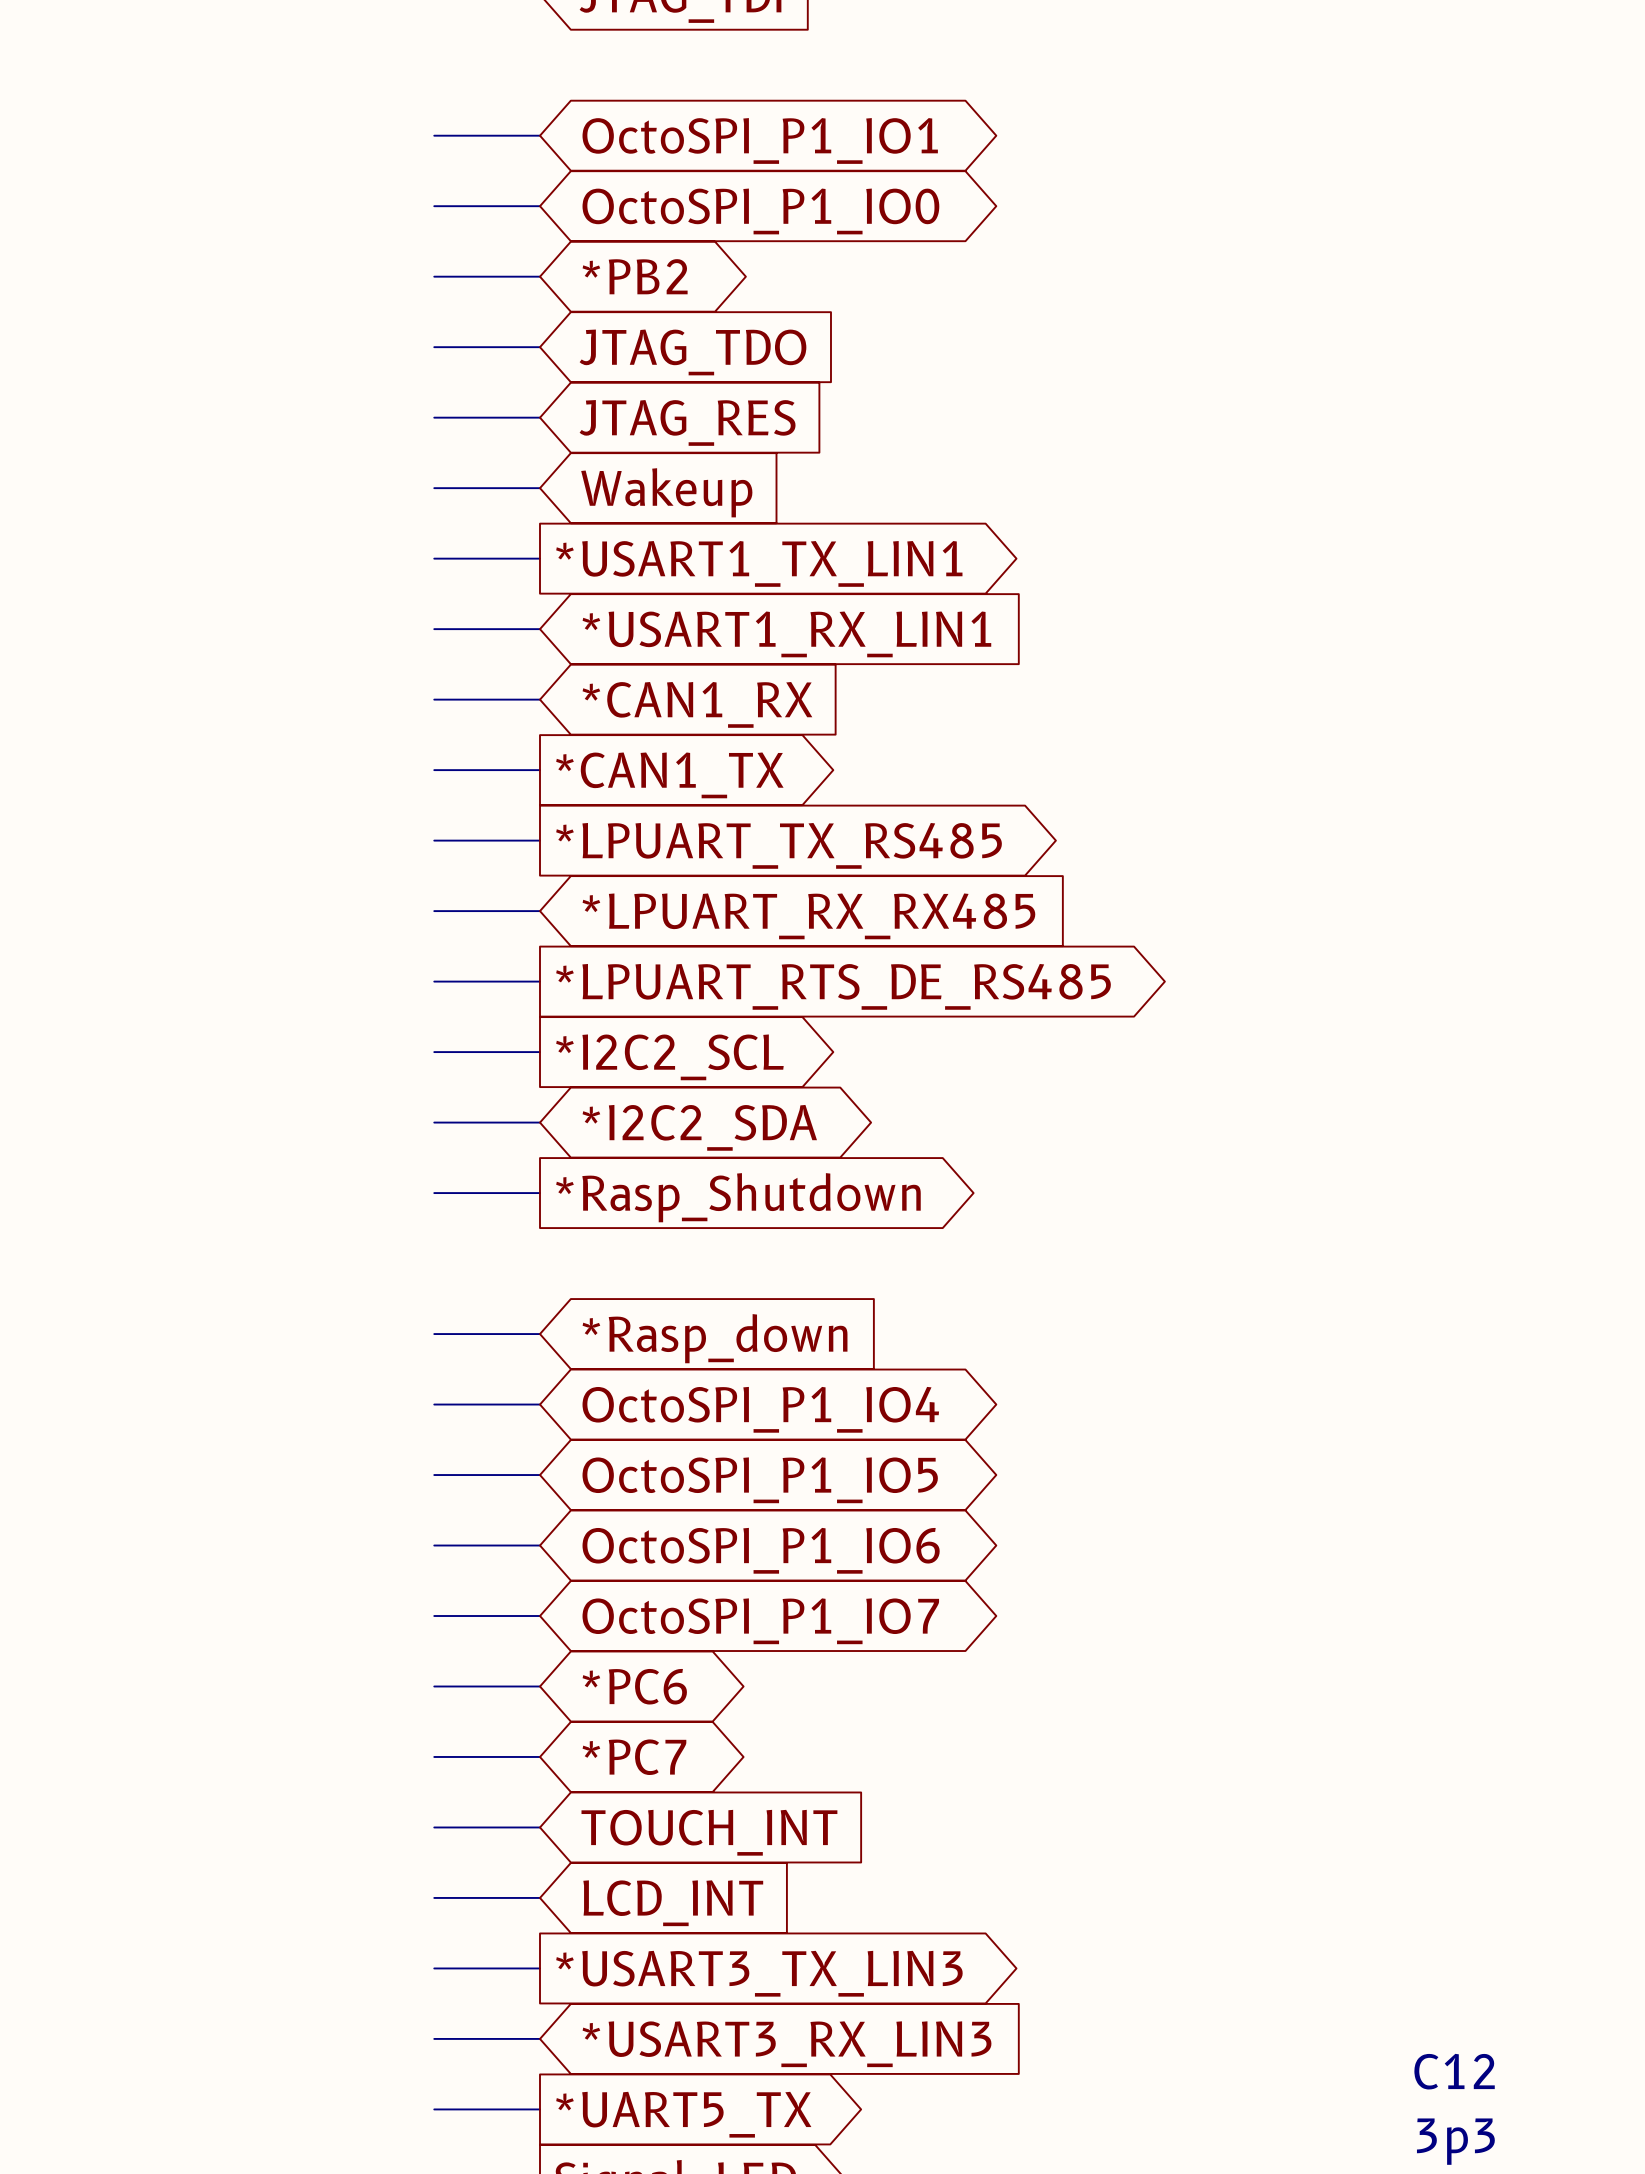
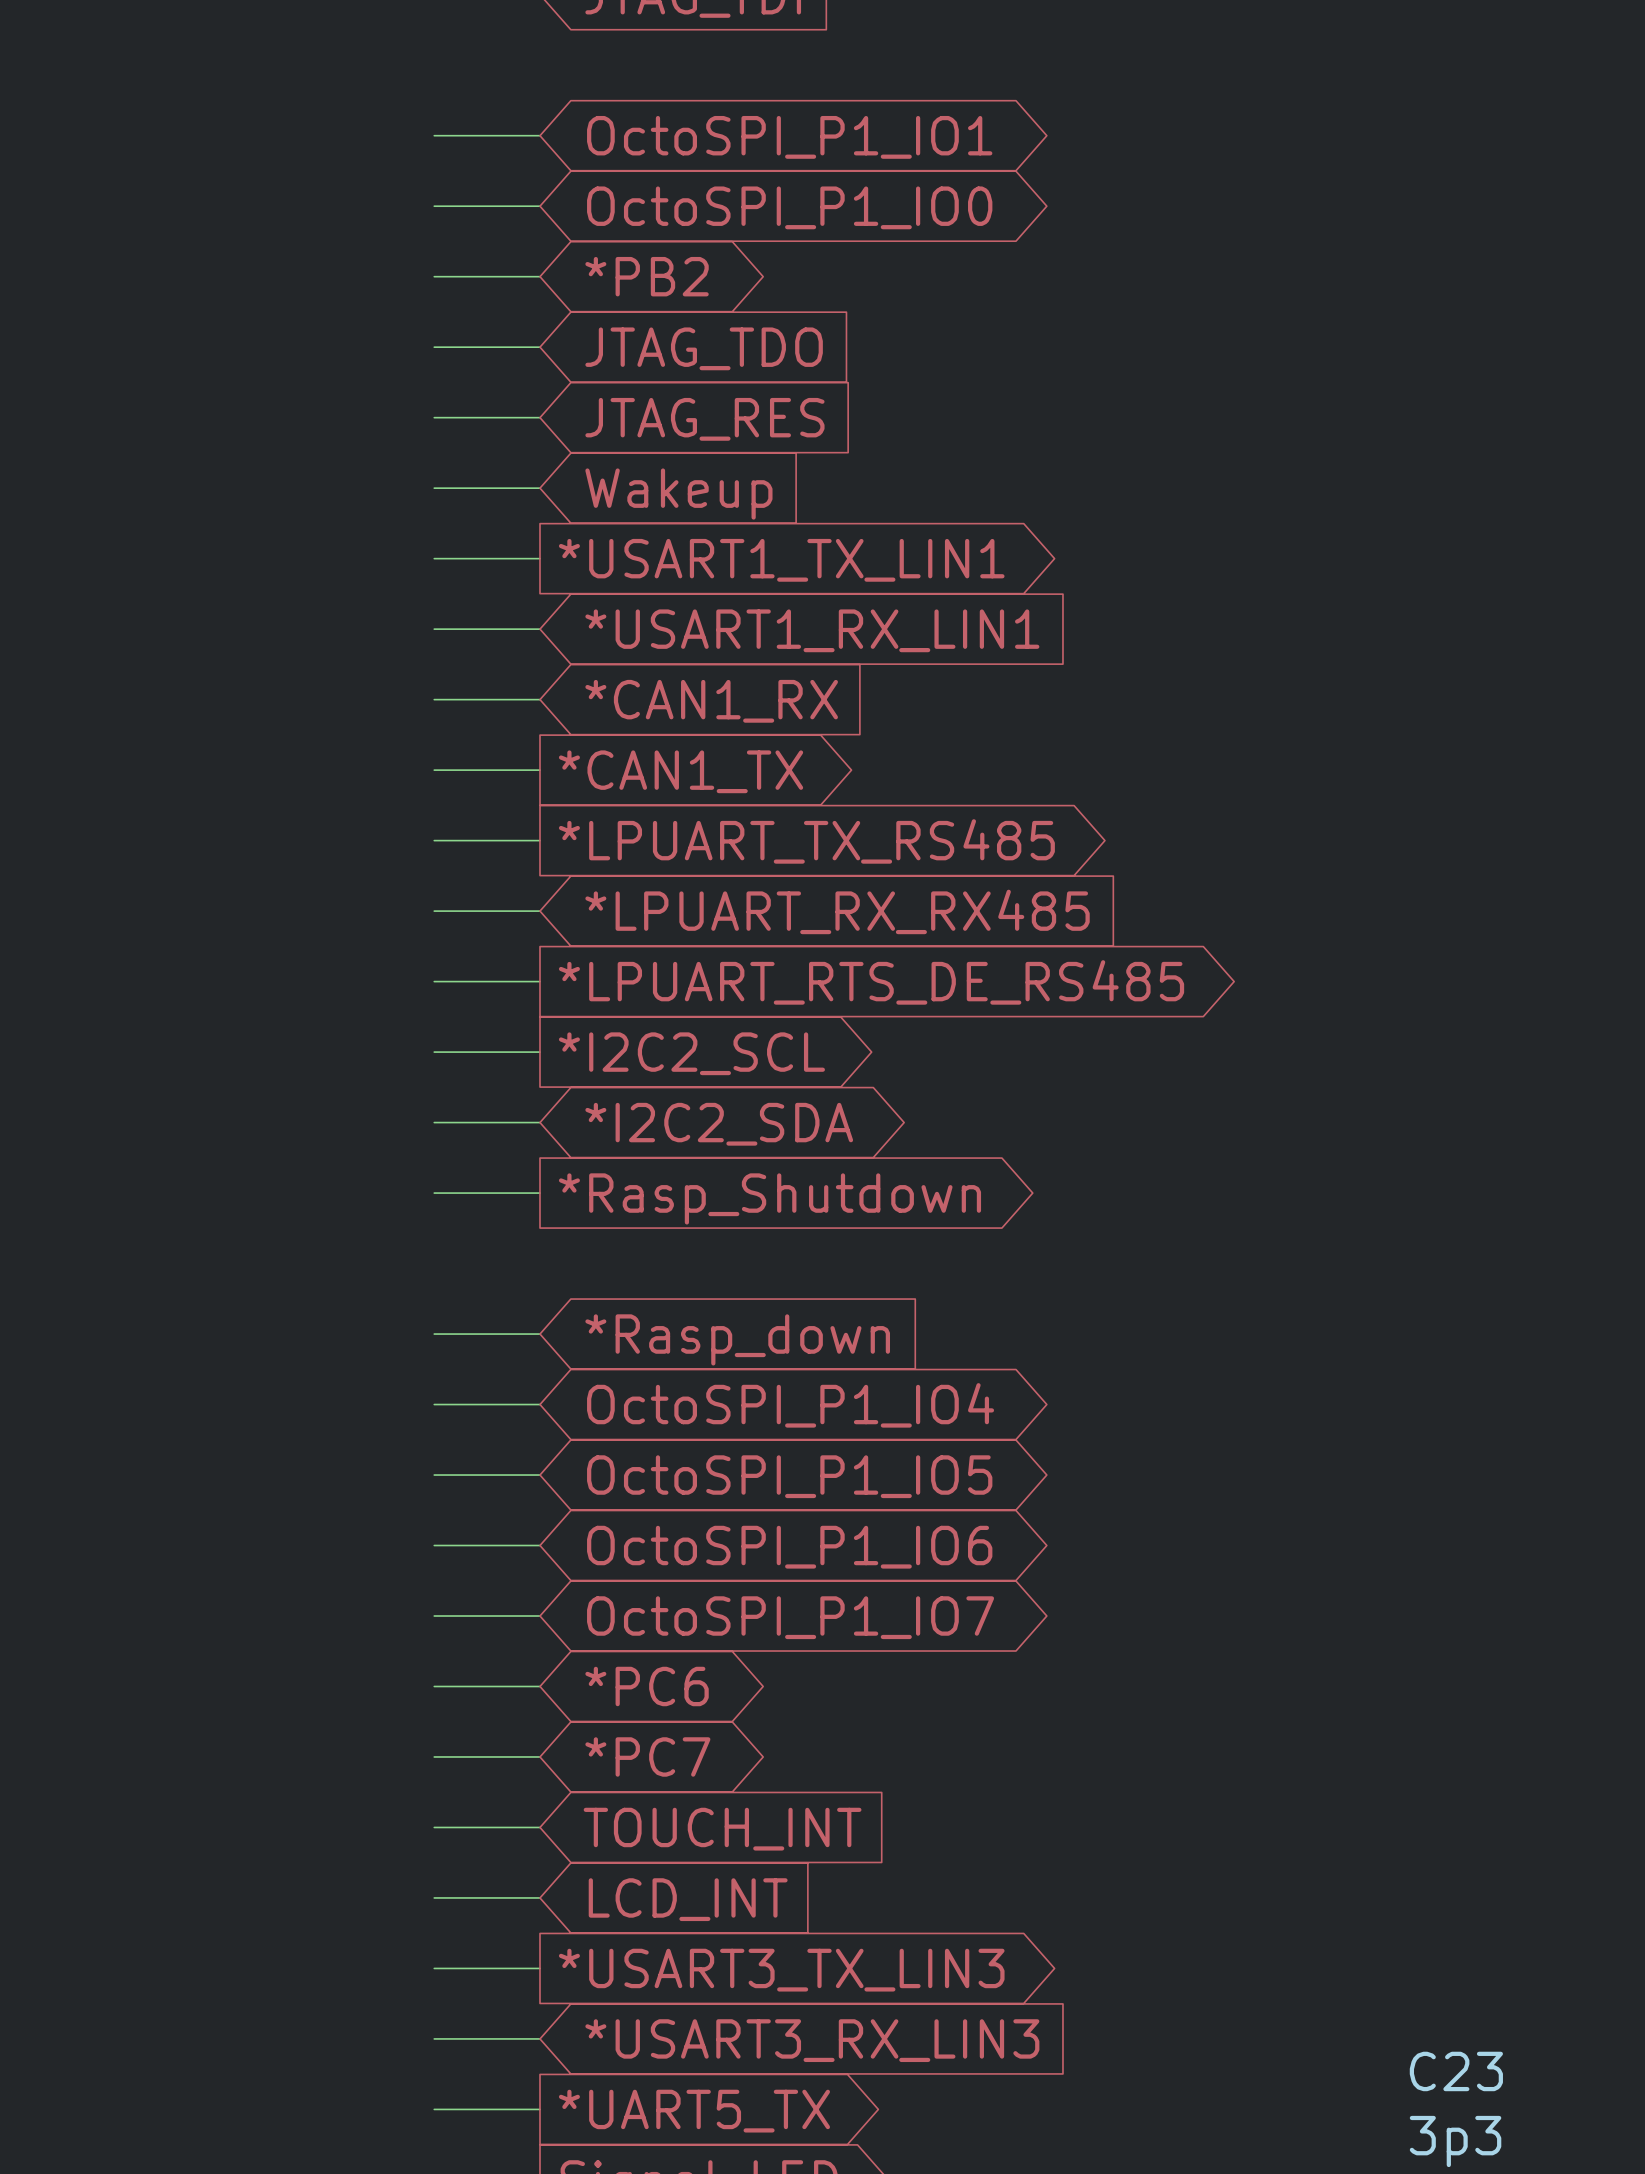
C12 name: C12 (1454, 2071) -> C23 (1456, 2071)

